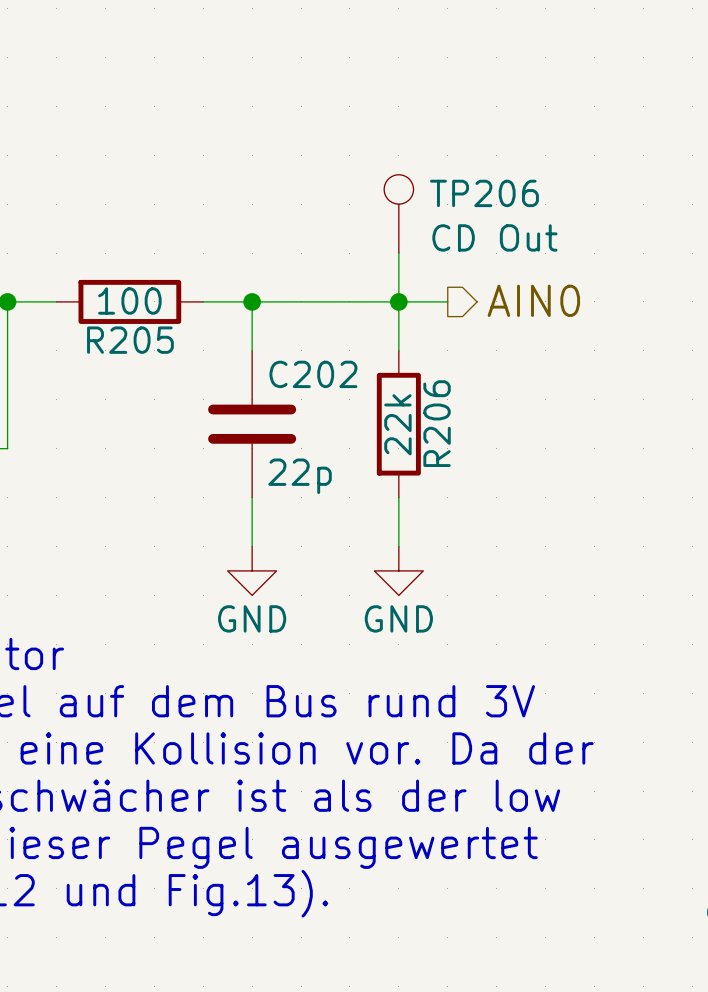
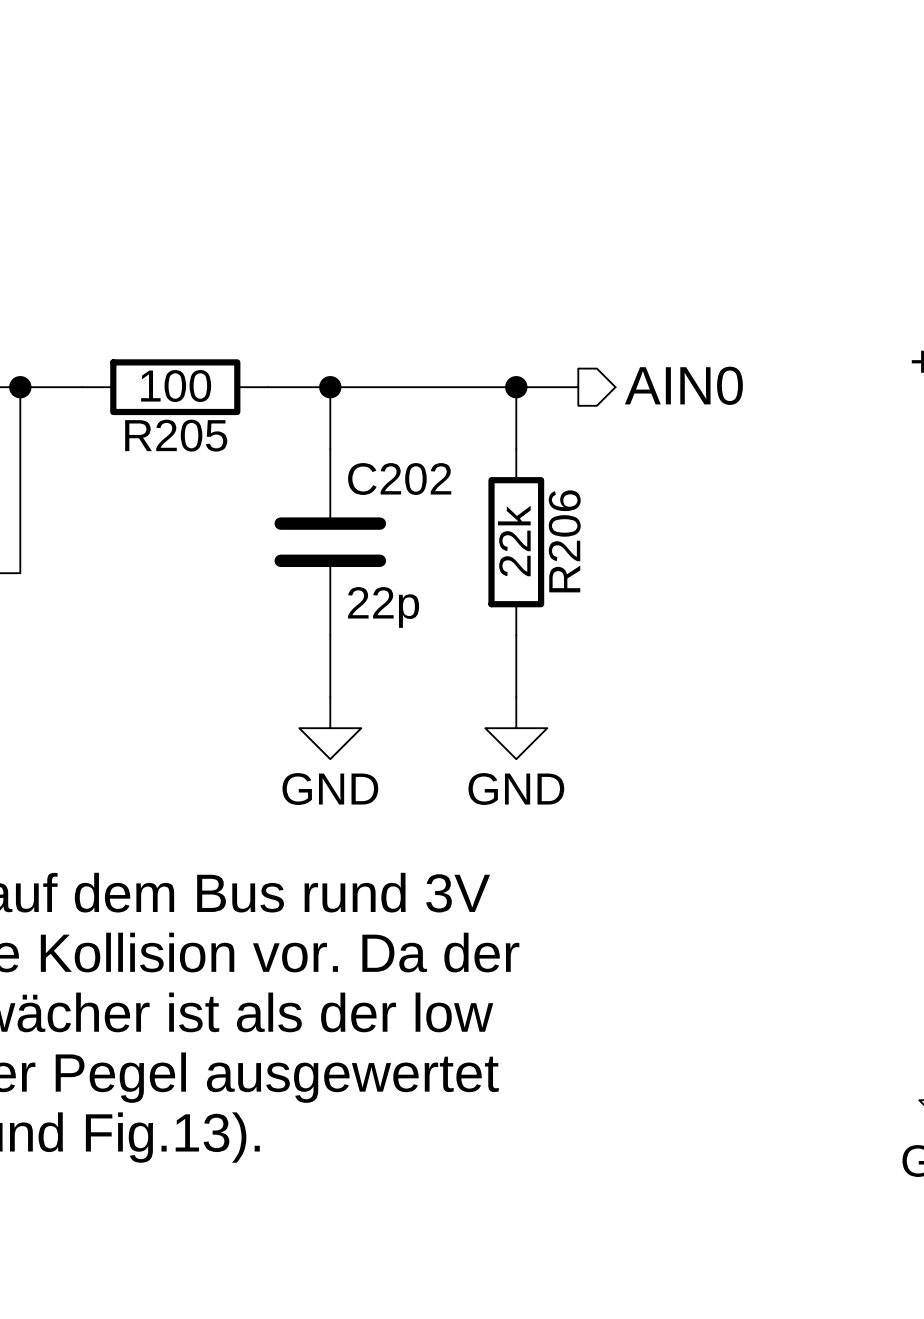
TP206: CD Out (398, 213) -> none
wire: (398, 253) (398, 301) -> none

